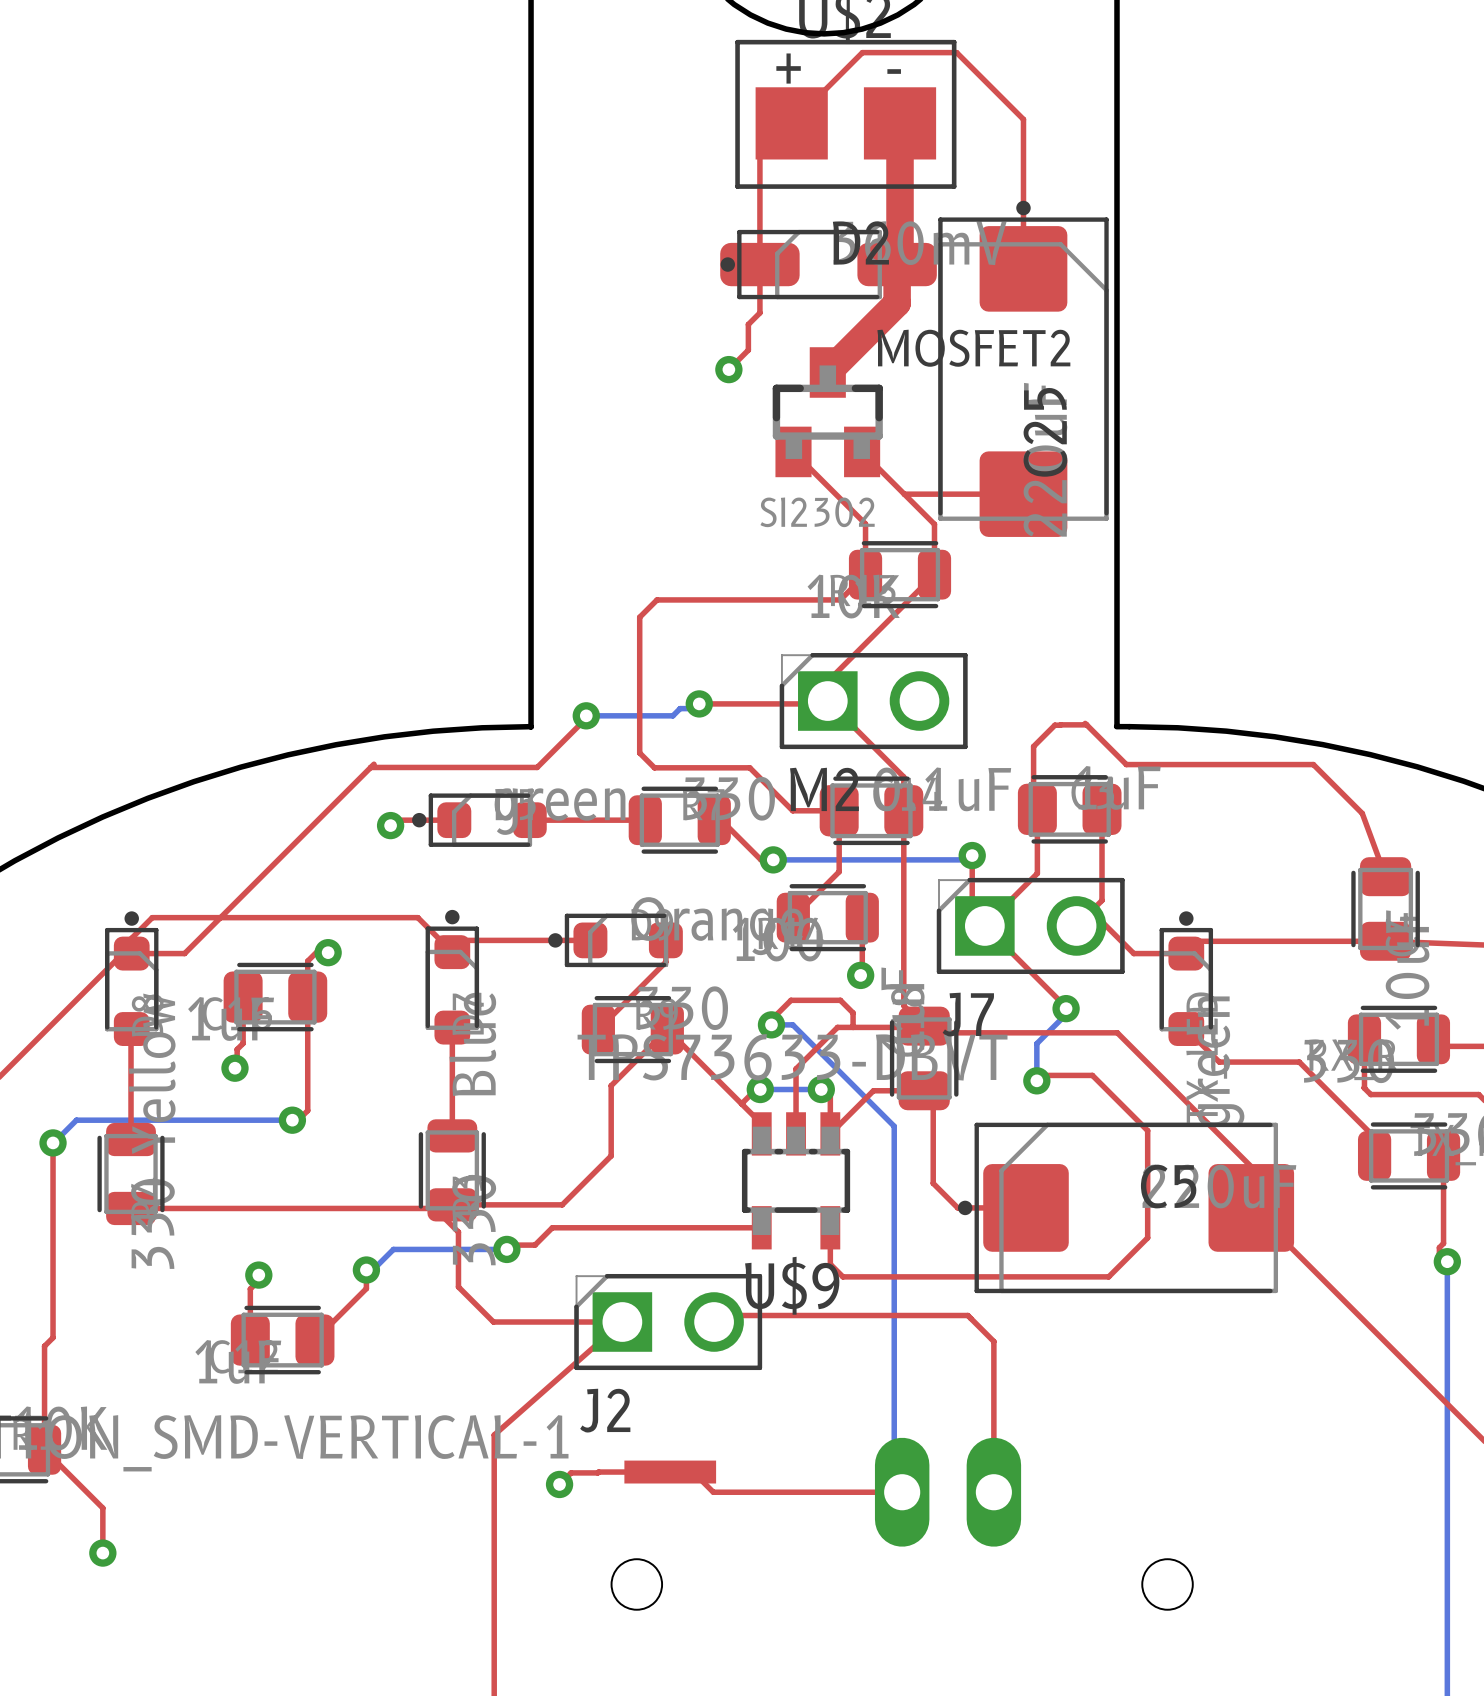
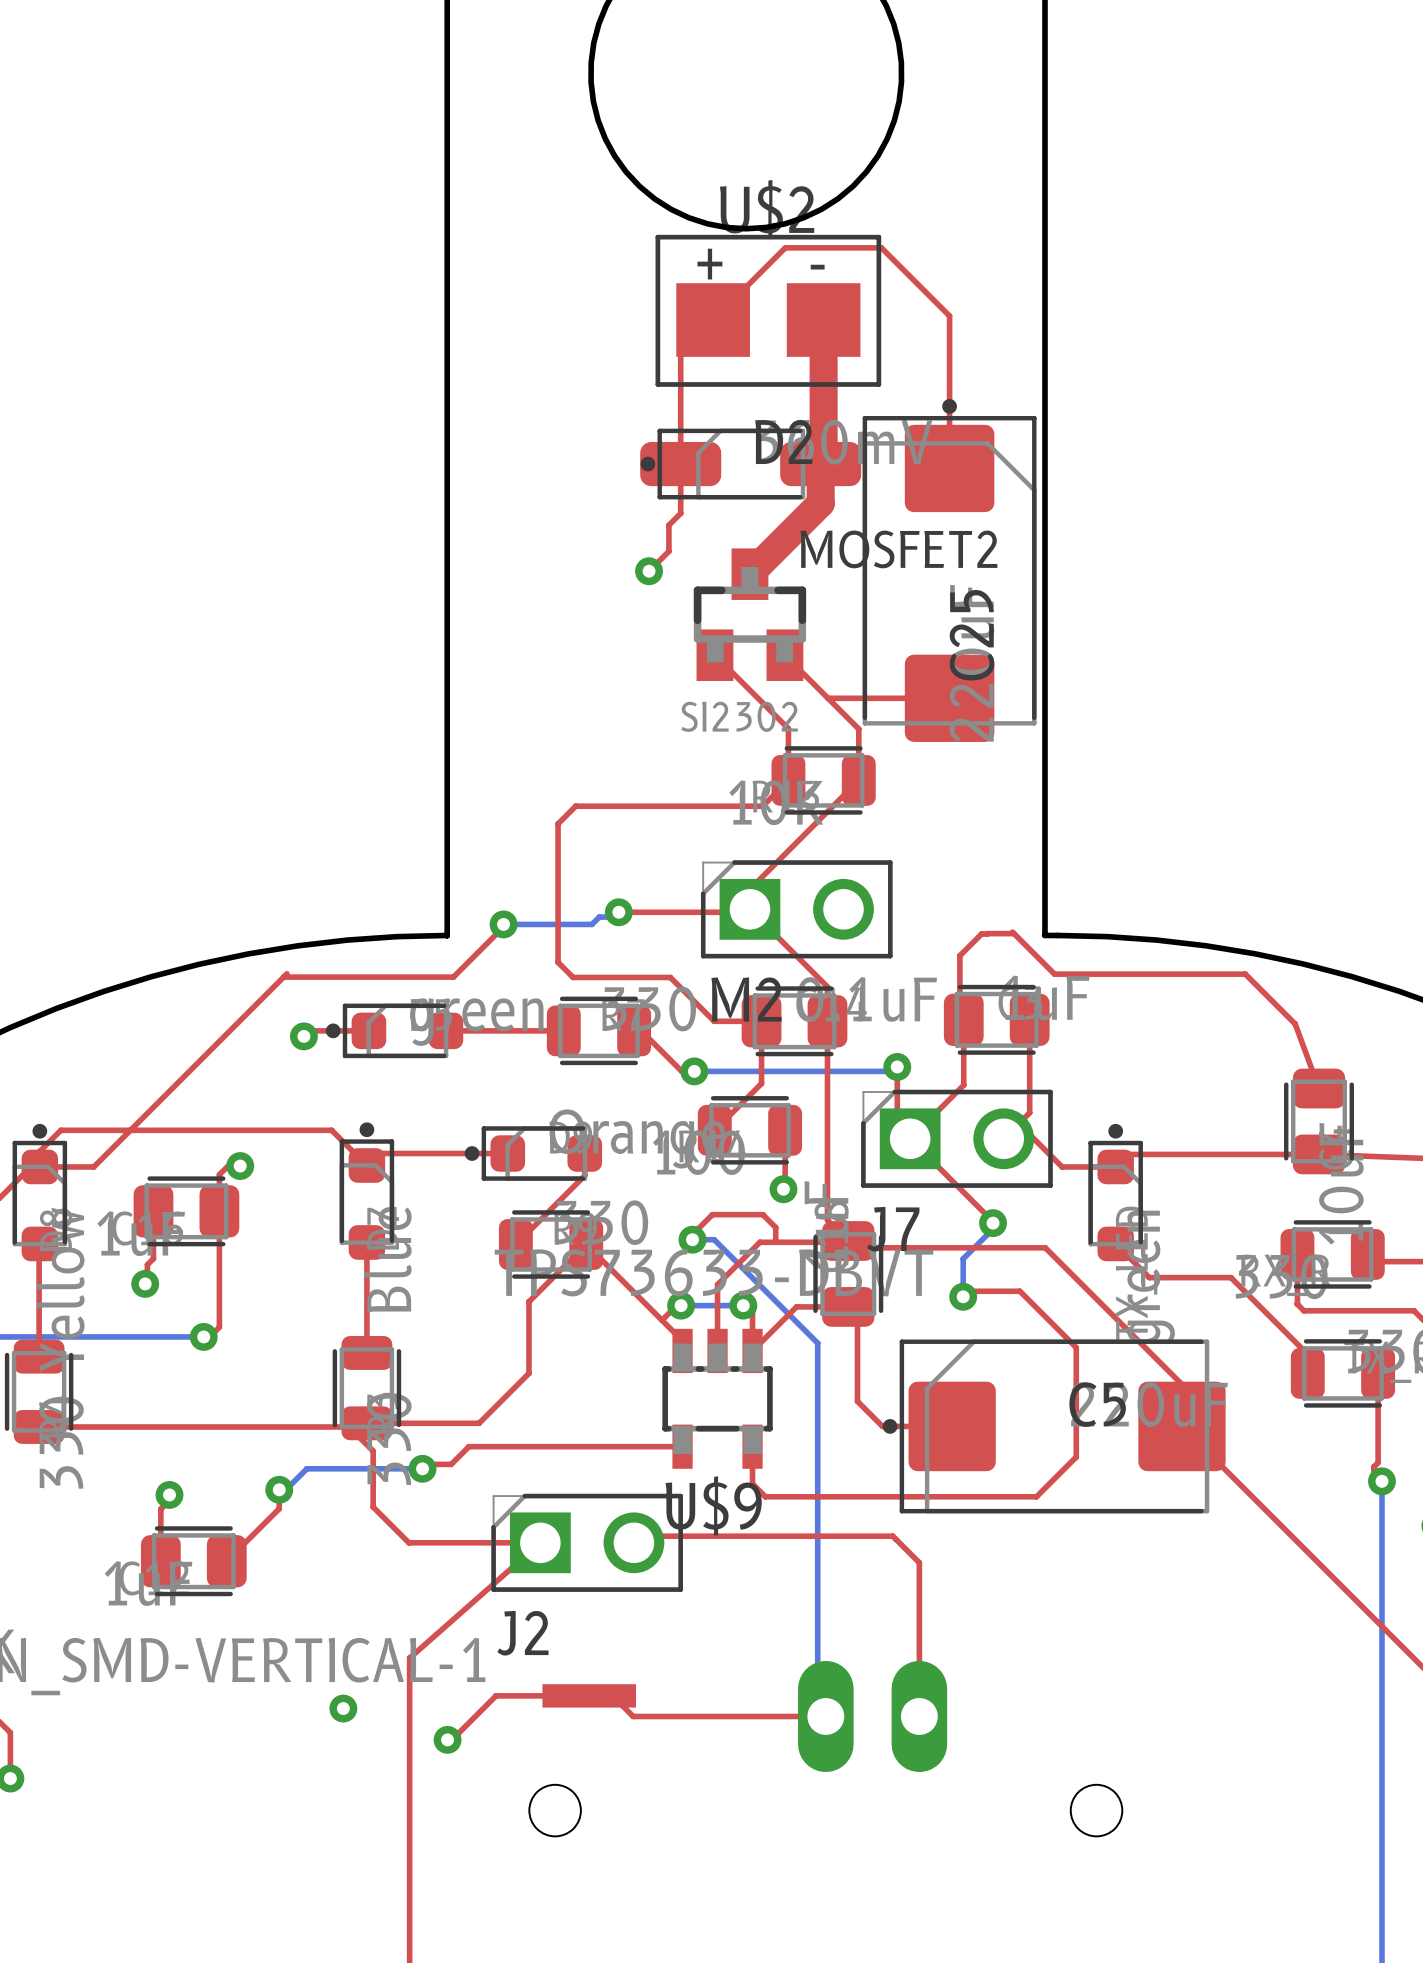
top track: (598, 1472) (571, 1472) (559, 1484) -> (516, 1695) (495, 1695) (451, 1739) (447, 1739)
via: none -> (343, 1708)
via position: (559, 1484) -> (447, 1739)

